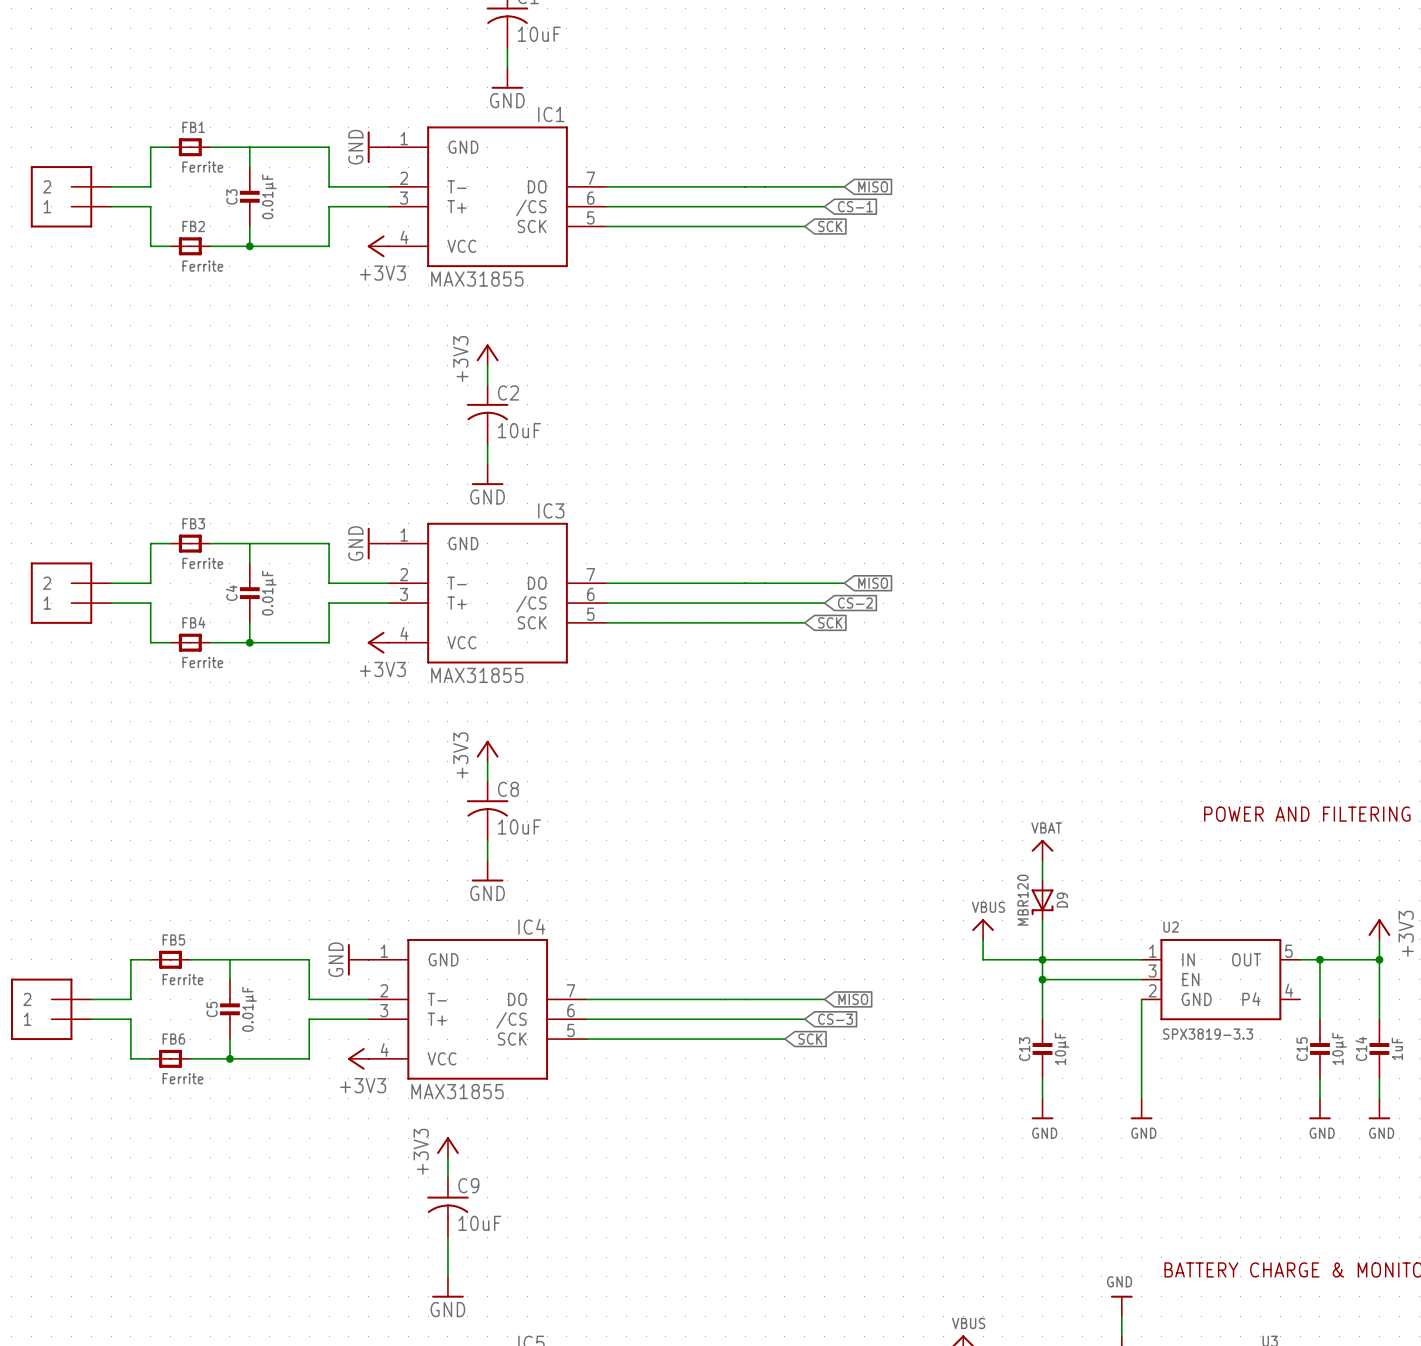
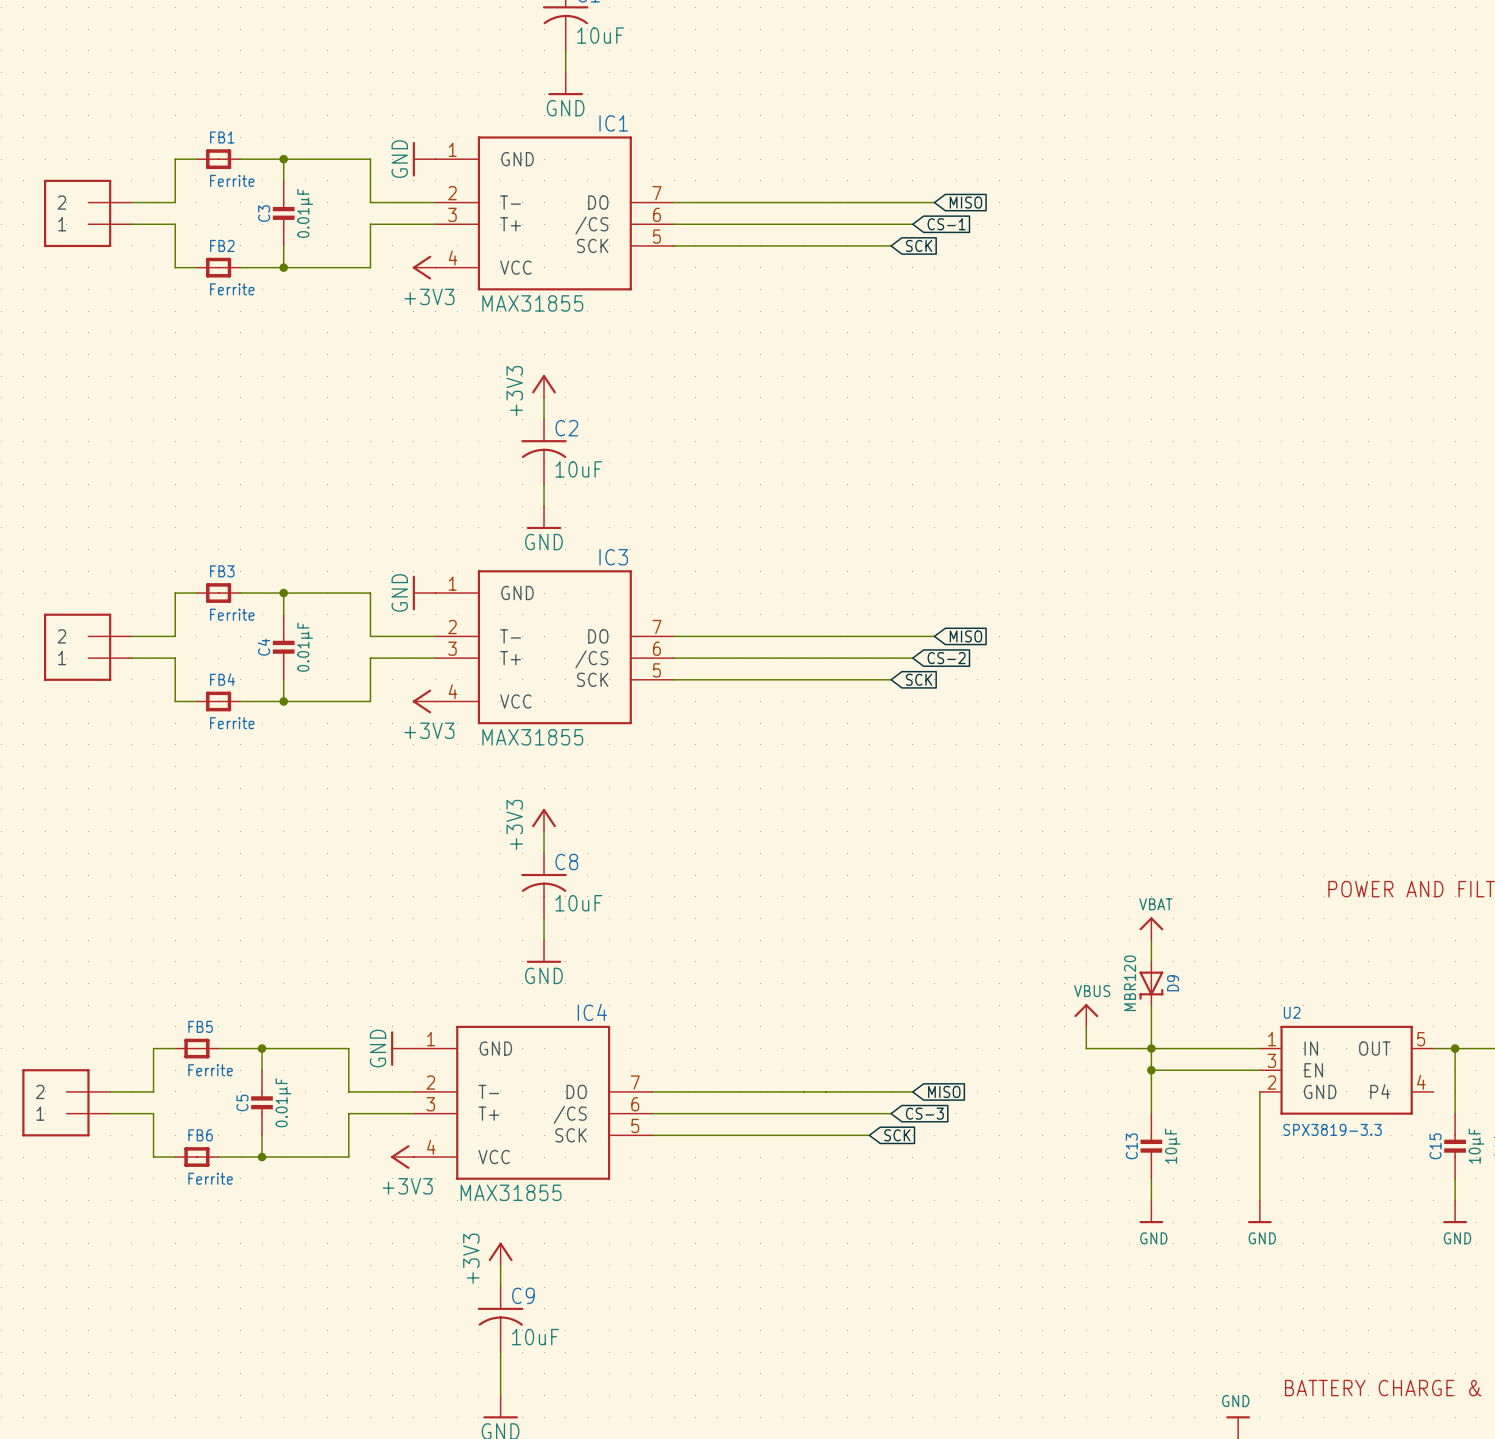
junction: none -> (283, 159)
junction: none -> (283, 593)
junction: none -> (262, 1048)

